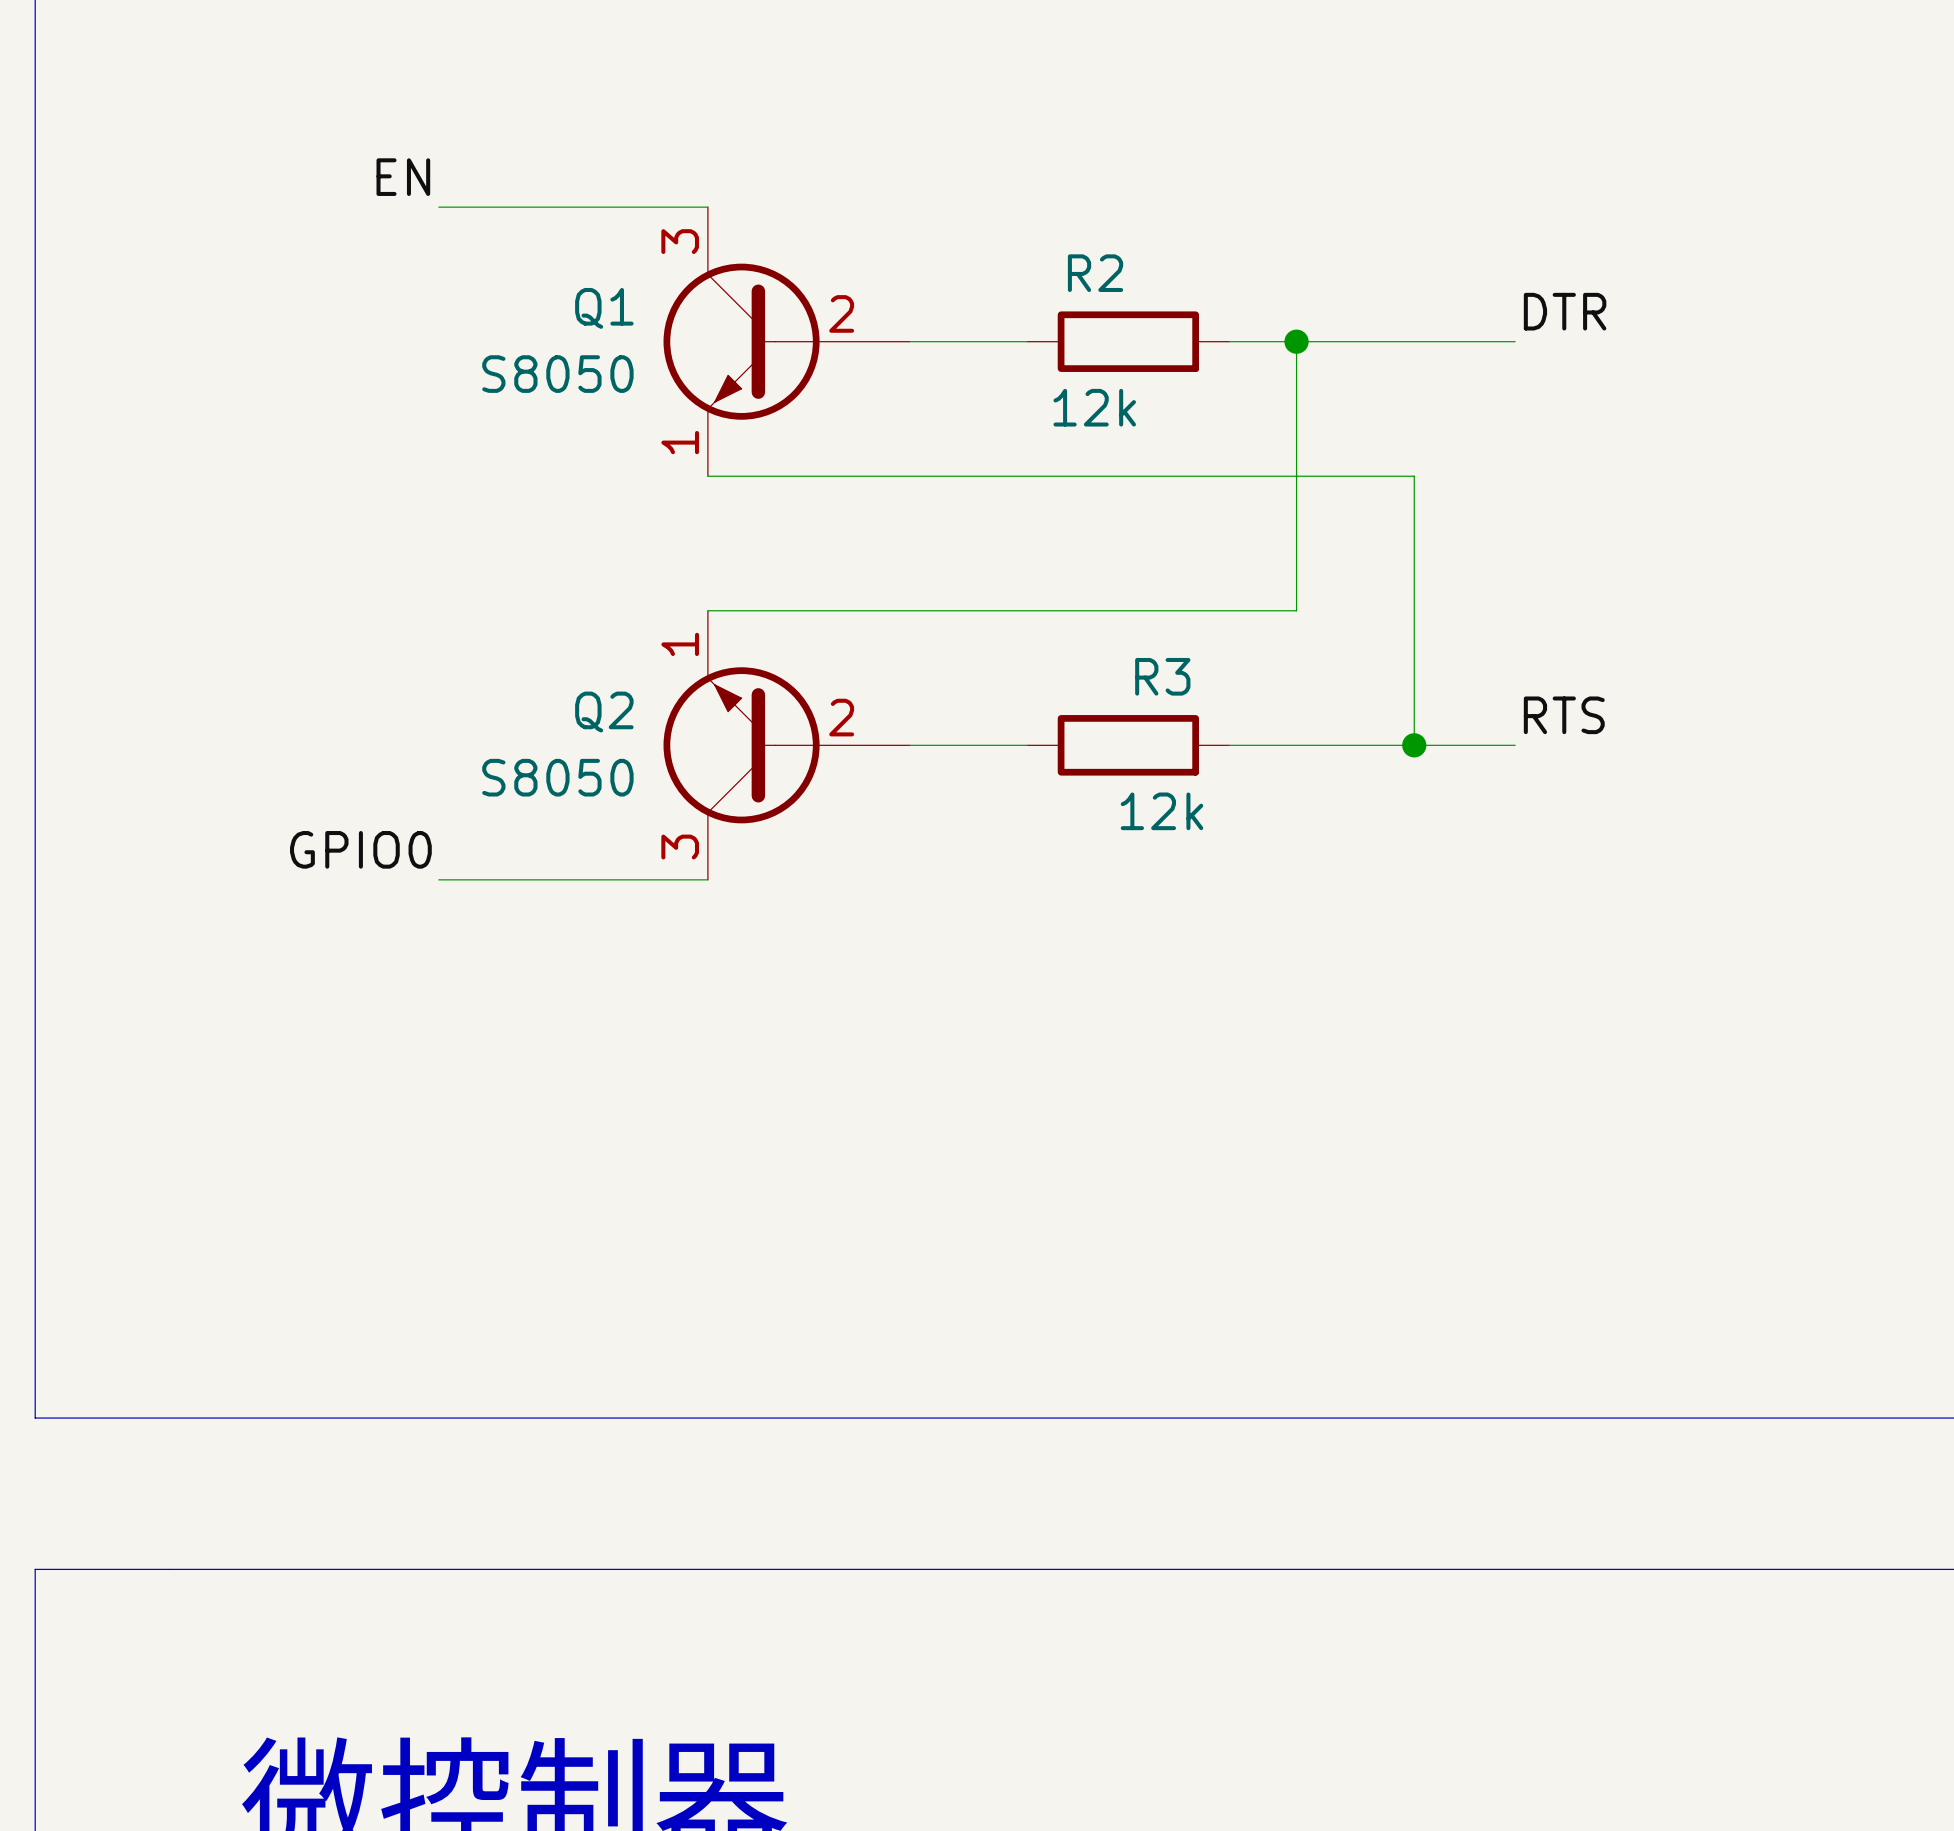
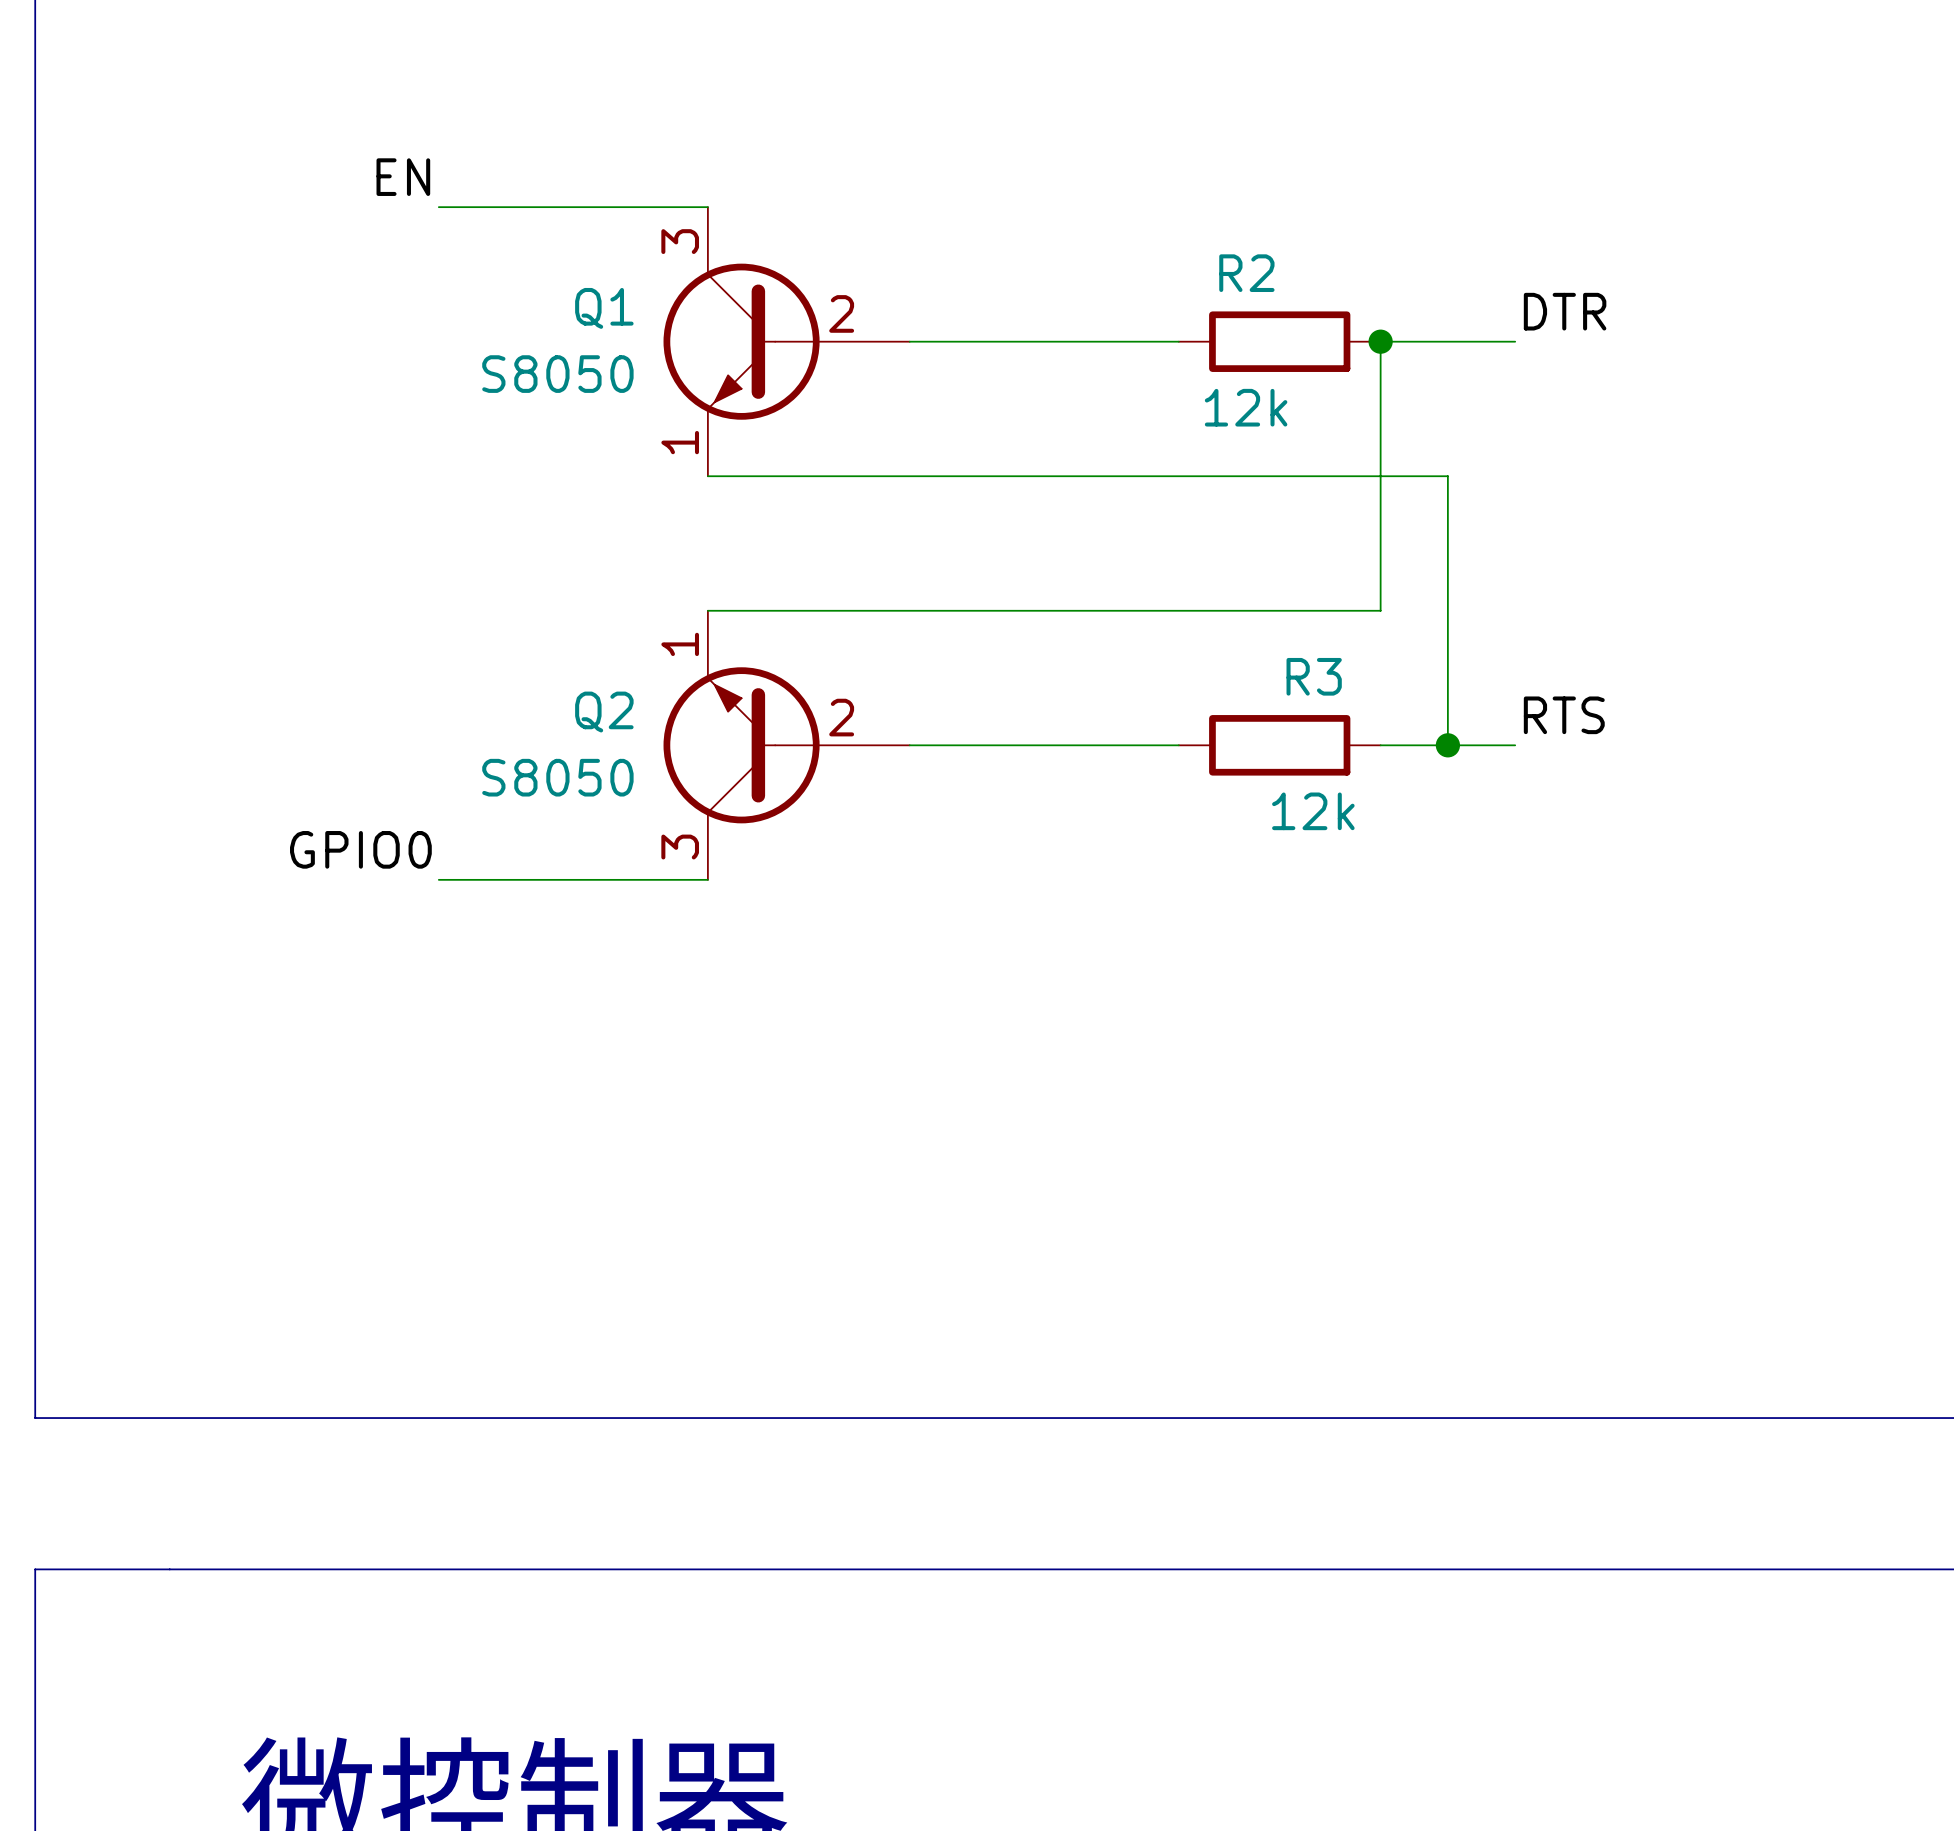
R2 position: (1128, 341) -> (1279, 341)
wire: (1229, 341) (1380, 341) -> (1027, 341) (1178, 341)
wire: (1296, 341) (1296, 610) -> (1380, 341) (1380, 610) (1296, 610)
junction position: (1296, 341) -> (1380, 341)
wire: (1414, 476) (1414, 745) -> (1414, 476) (1447, 476) (1447, 745)
R3 position: (1128, 745) -> (1279, 745)
wire: (1229, 745) (1380, 745) -> (1027, 745) (1178, 745)
junction position: (1414, 745) -> (1447, 745)

